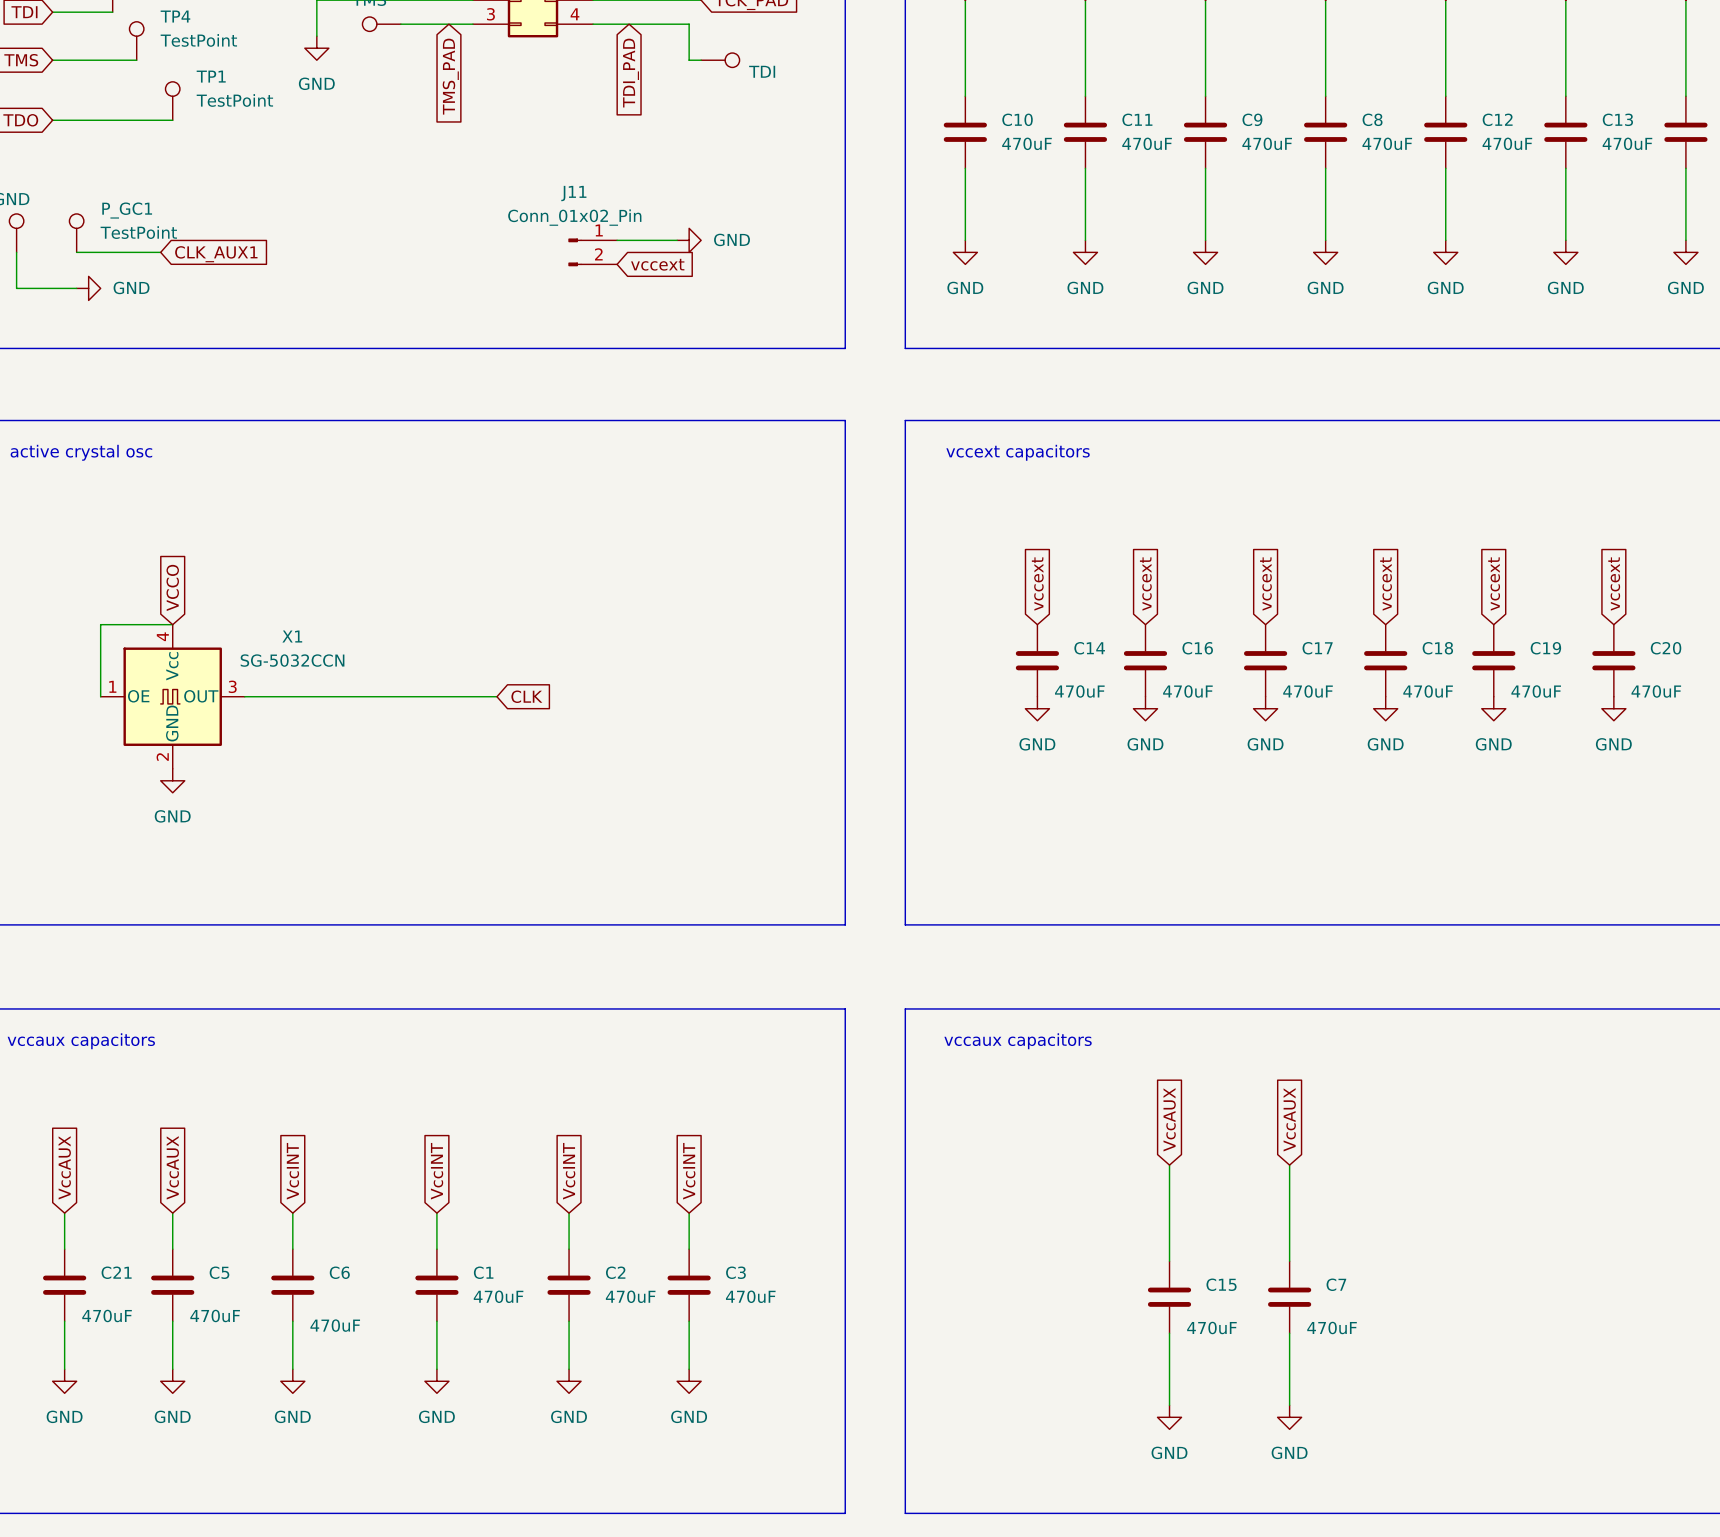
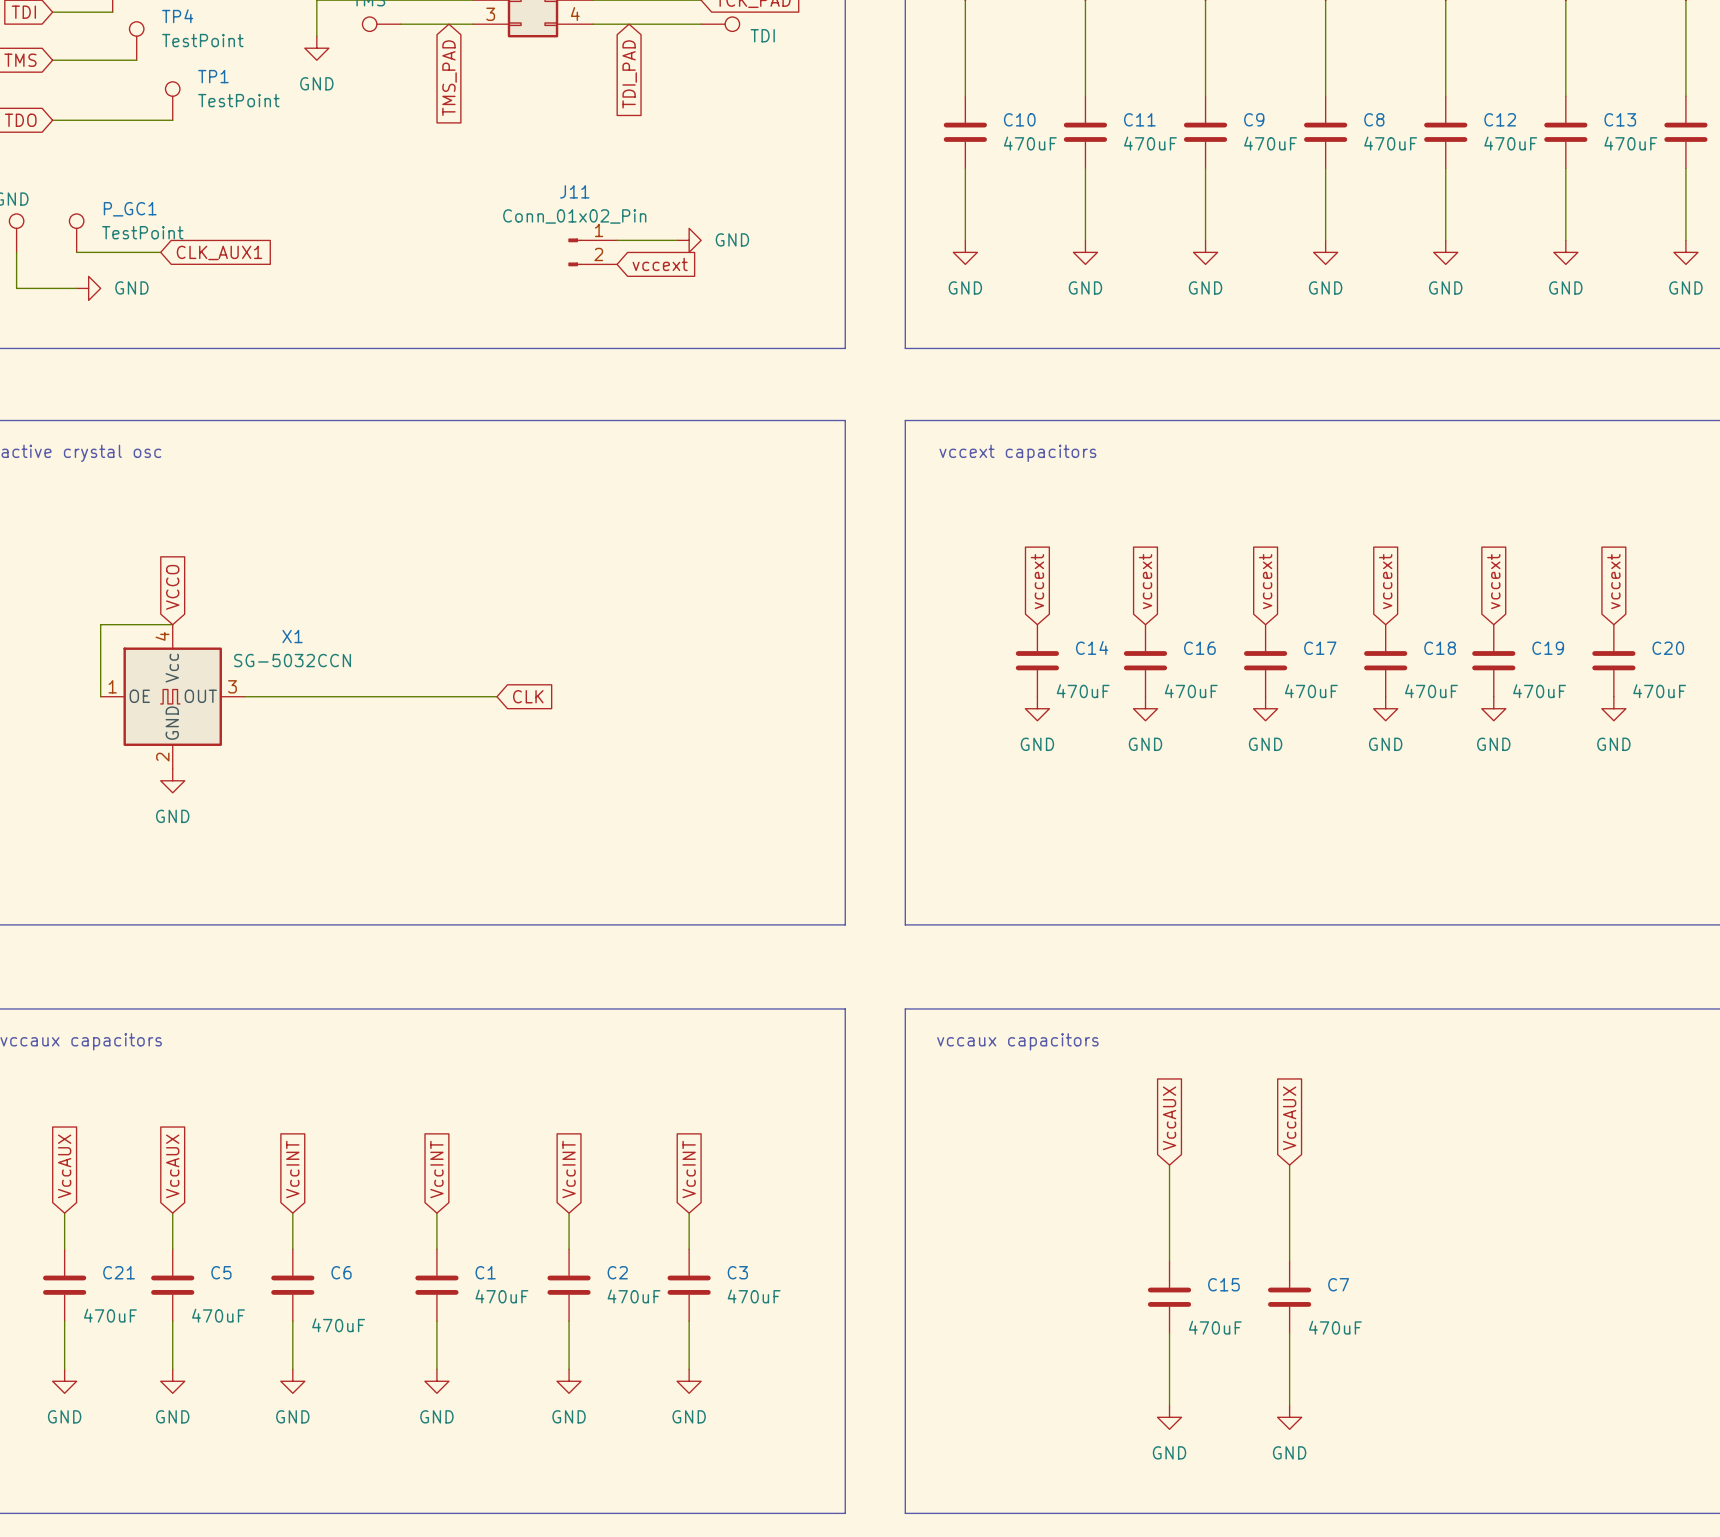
wire: (689, 24) (689, 60) (701, 60) -> (689, 24) (701, 24)
part position: (720, 60) -> (720, 24)

